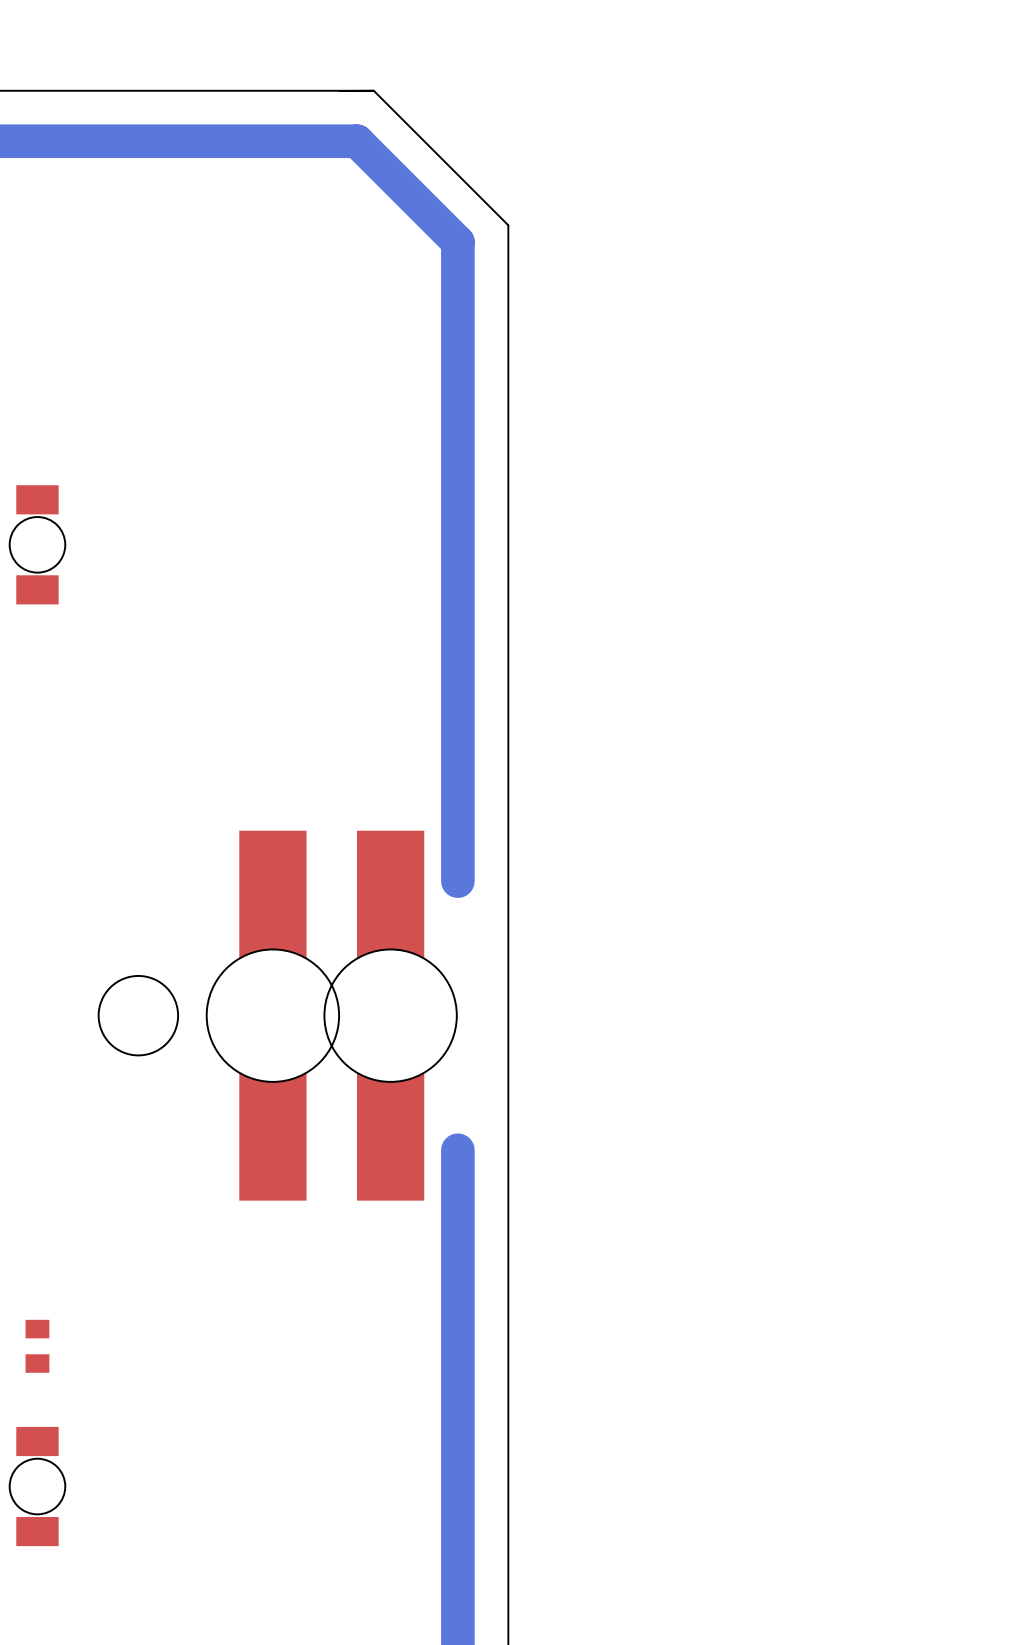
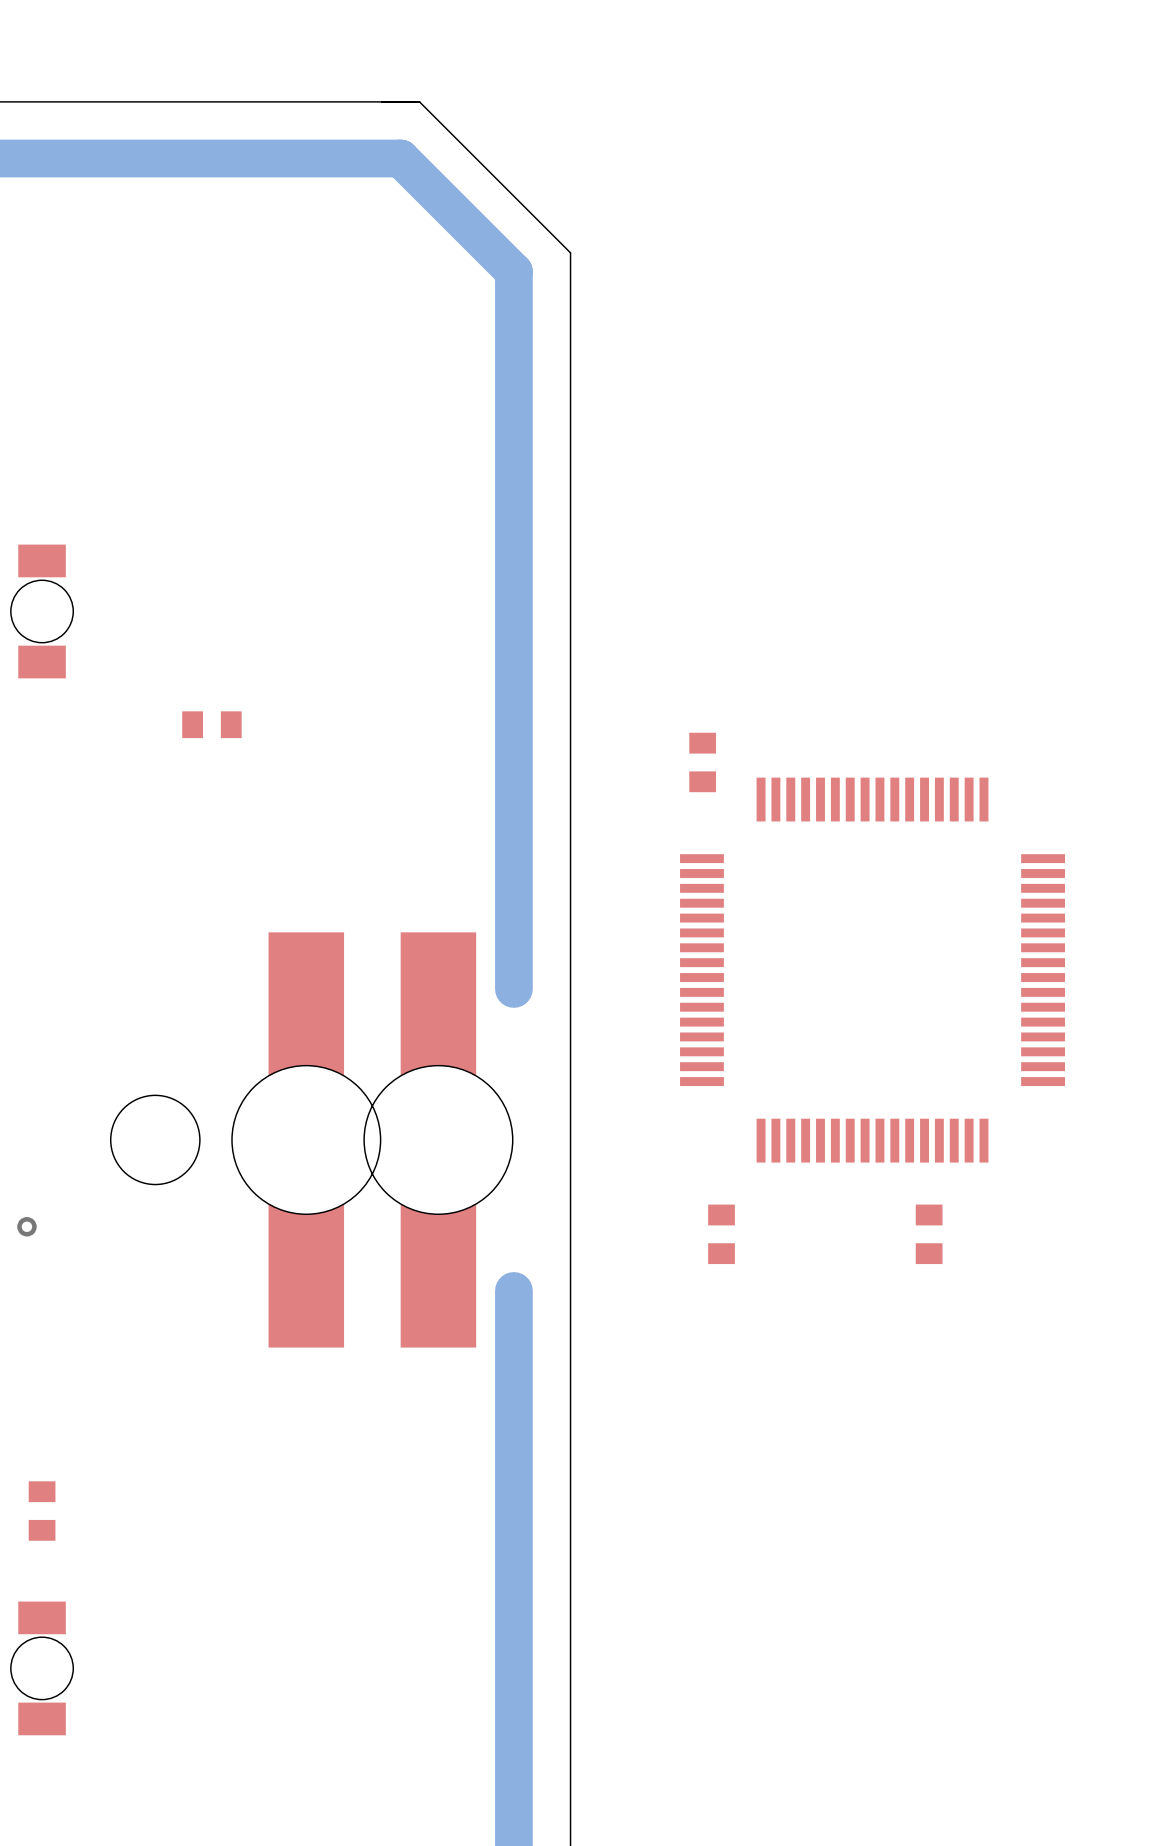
part: none -> (211, 724)
part: none -> (702, 762)
part: none -> (872, 970)
via: none -> (26, 1226)
part: none -> (721, 1234)
part: none -> (929, 1234)

